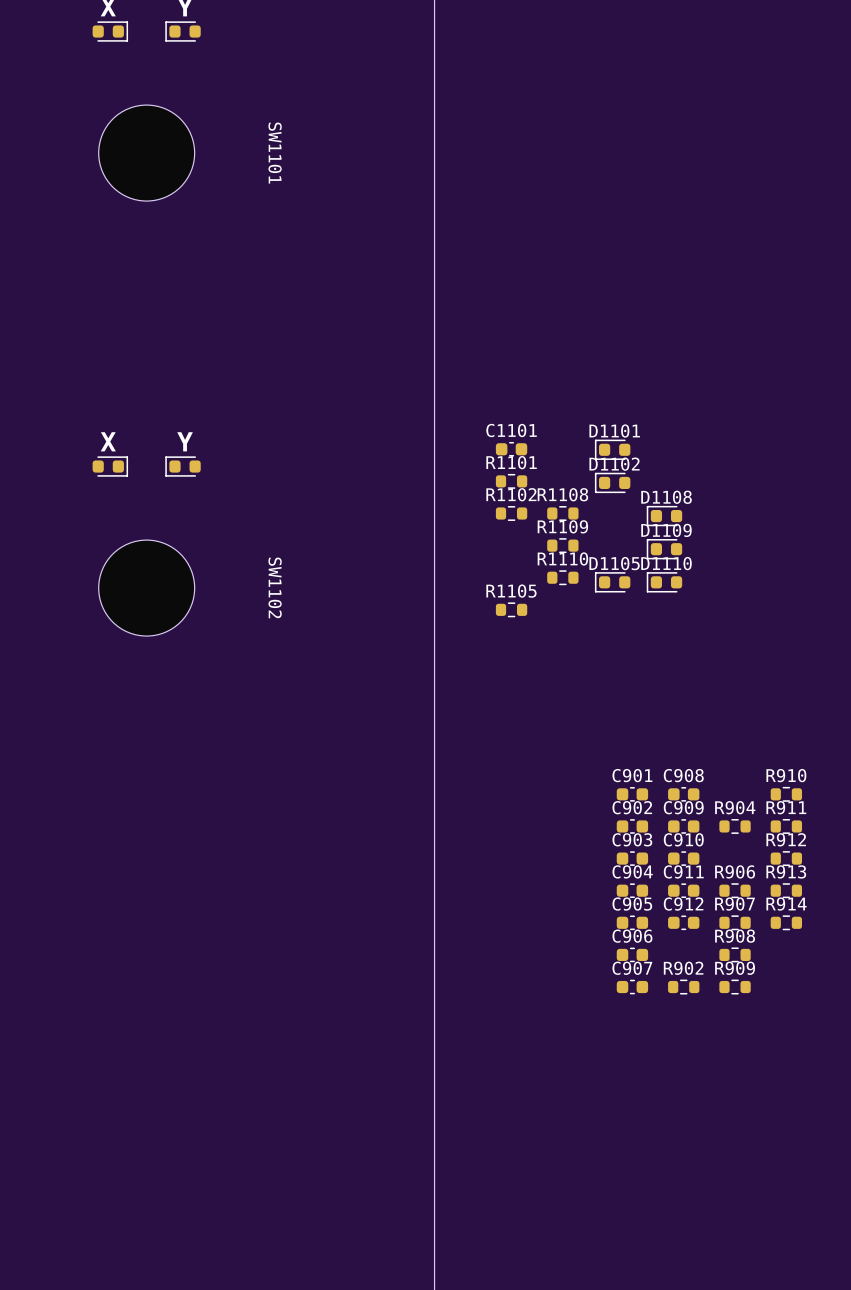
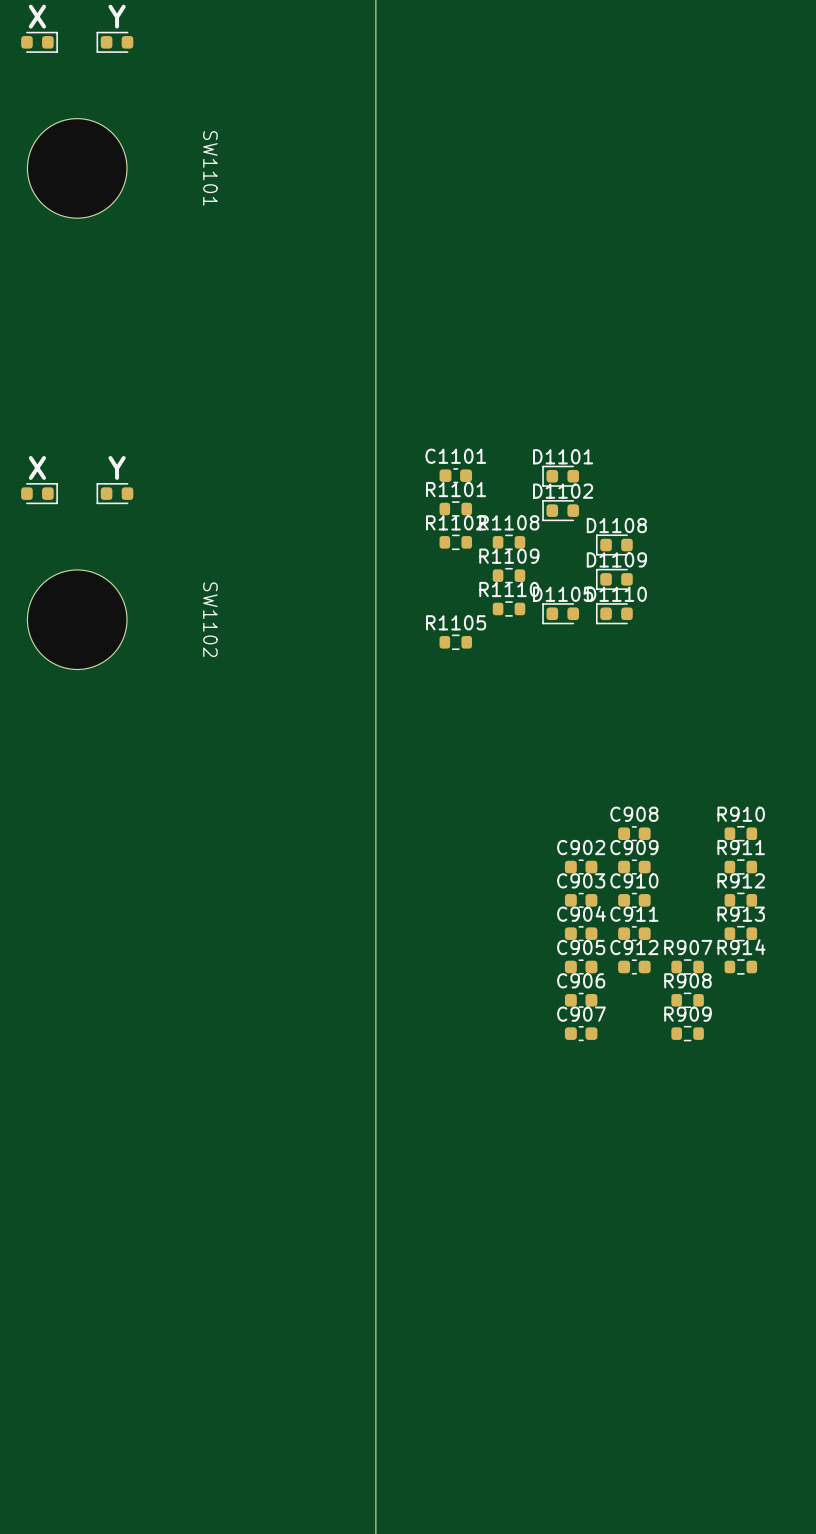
C901: (632, 794) -> none
R904: (735, 826) -> none
R906: (735, 890) -> none
R902: (683, 987) -> none

